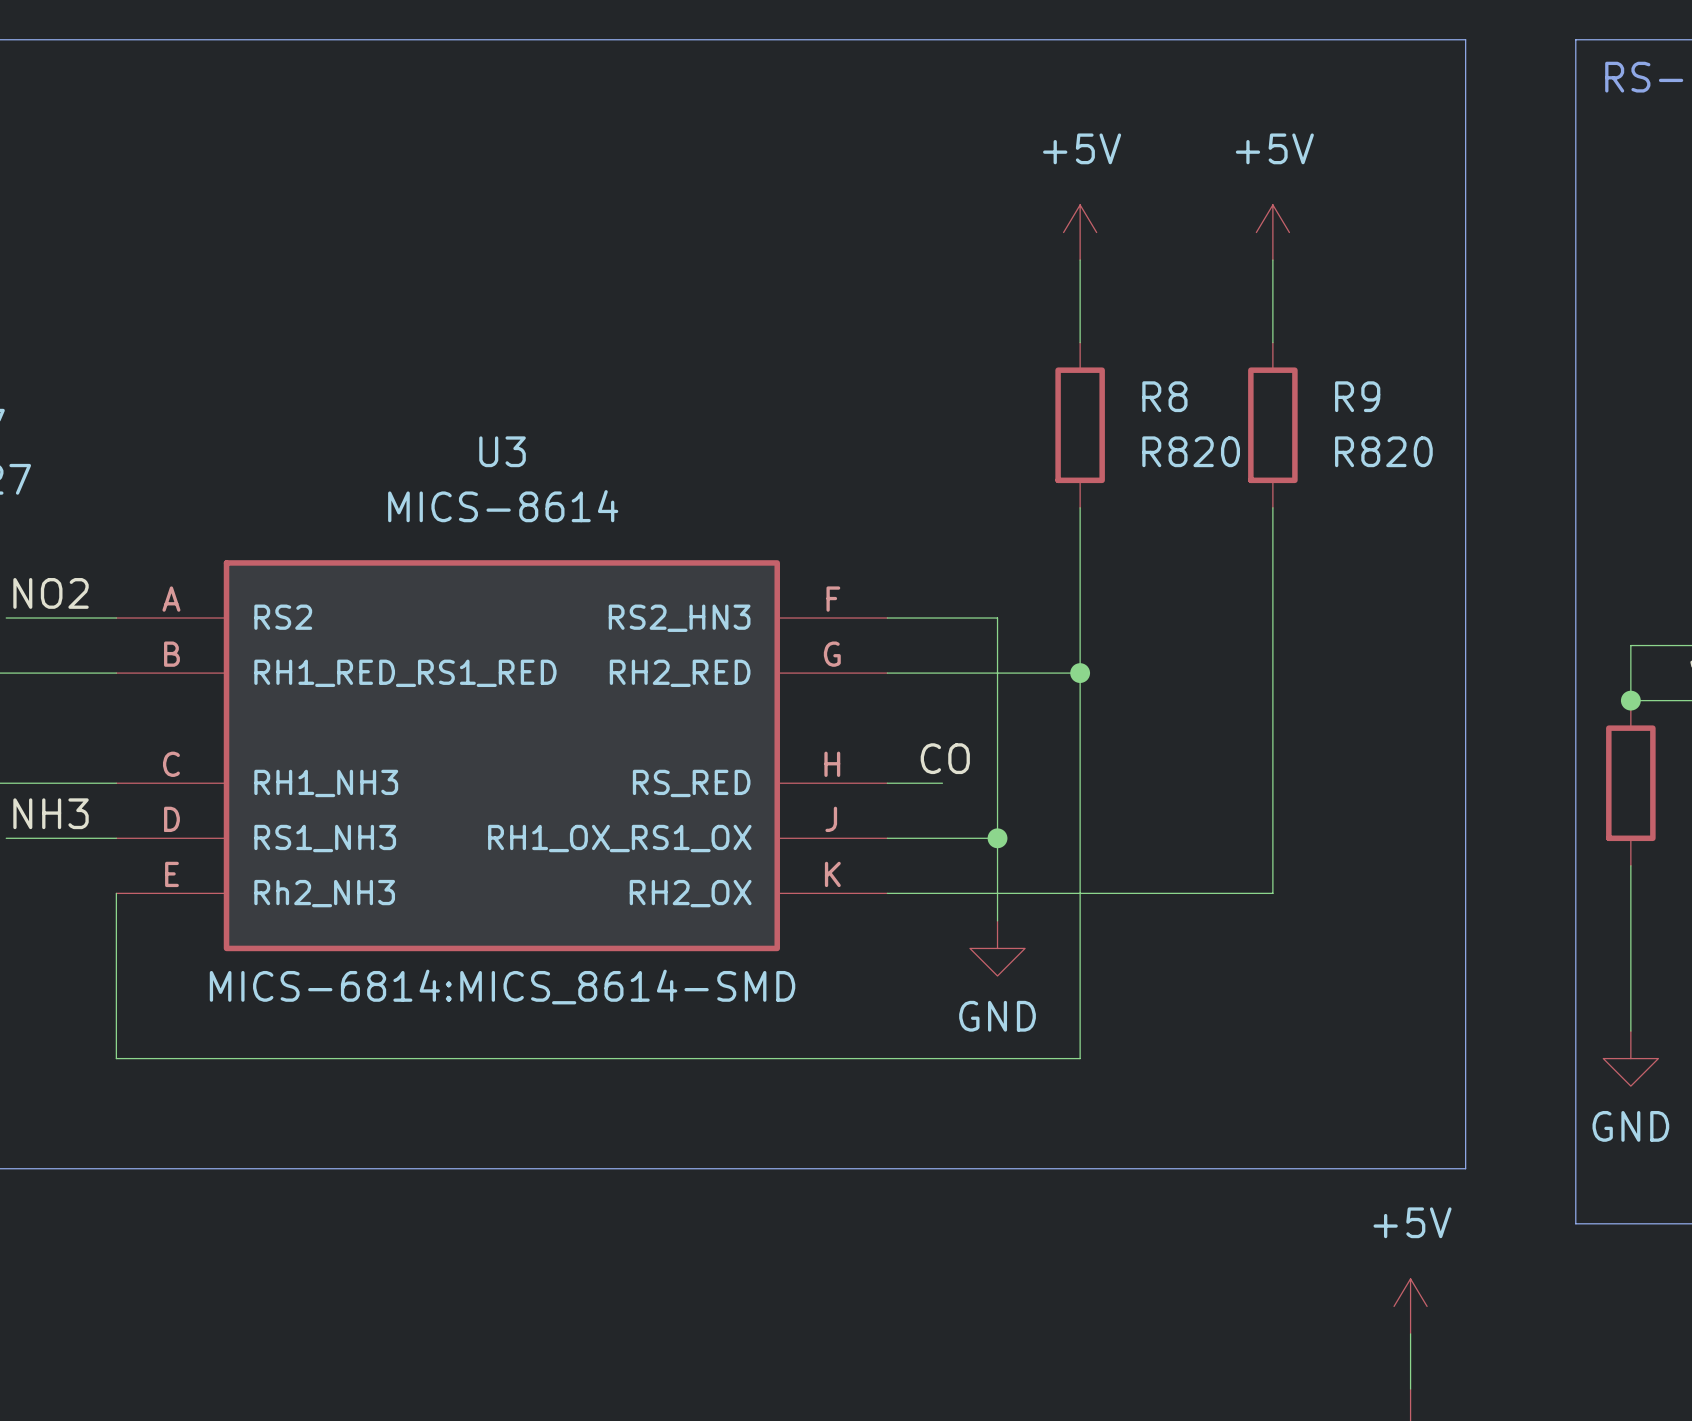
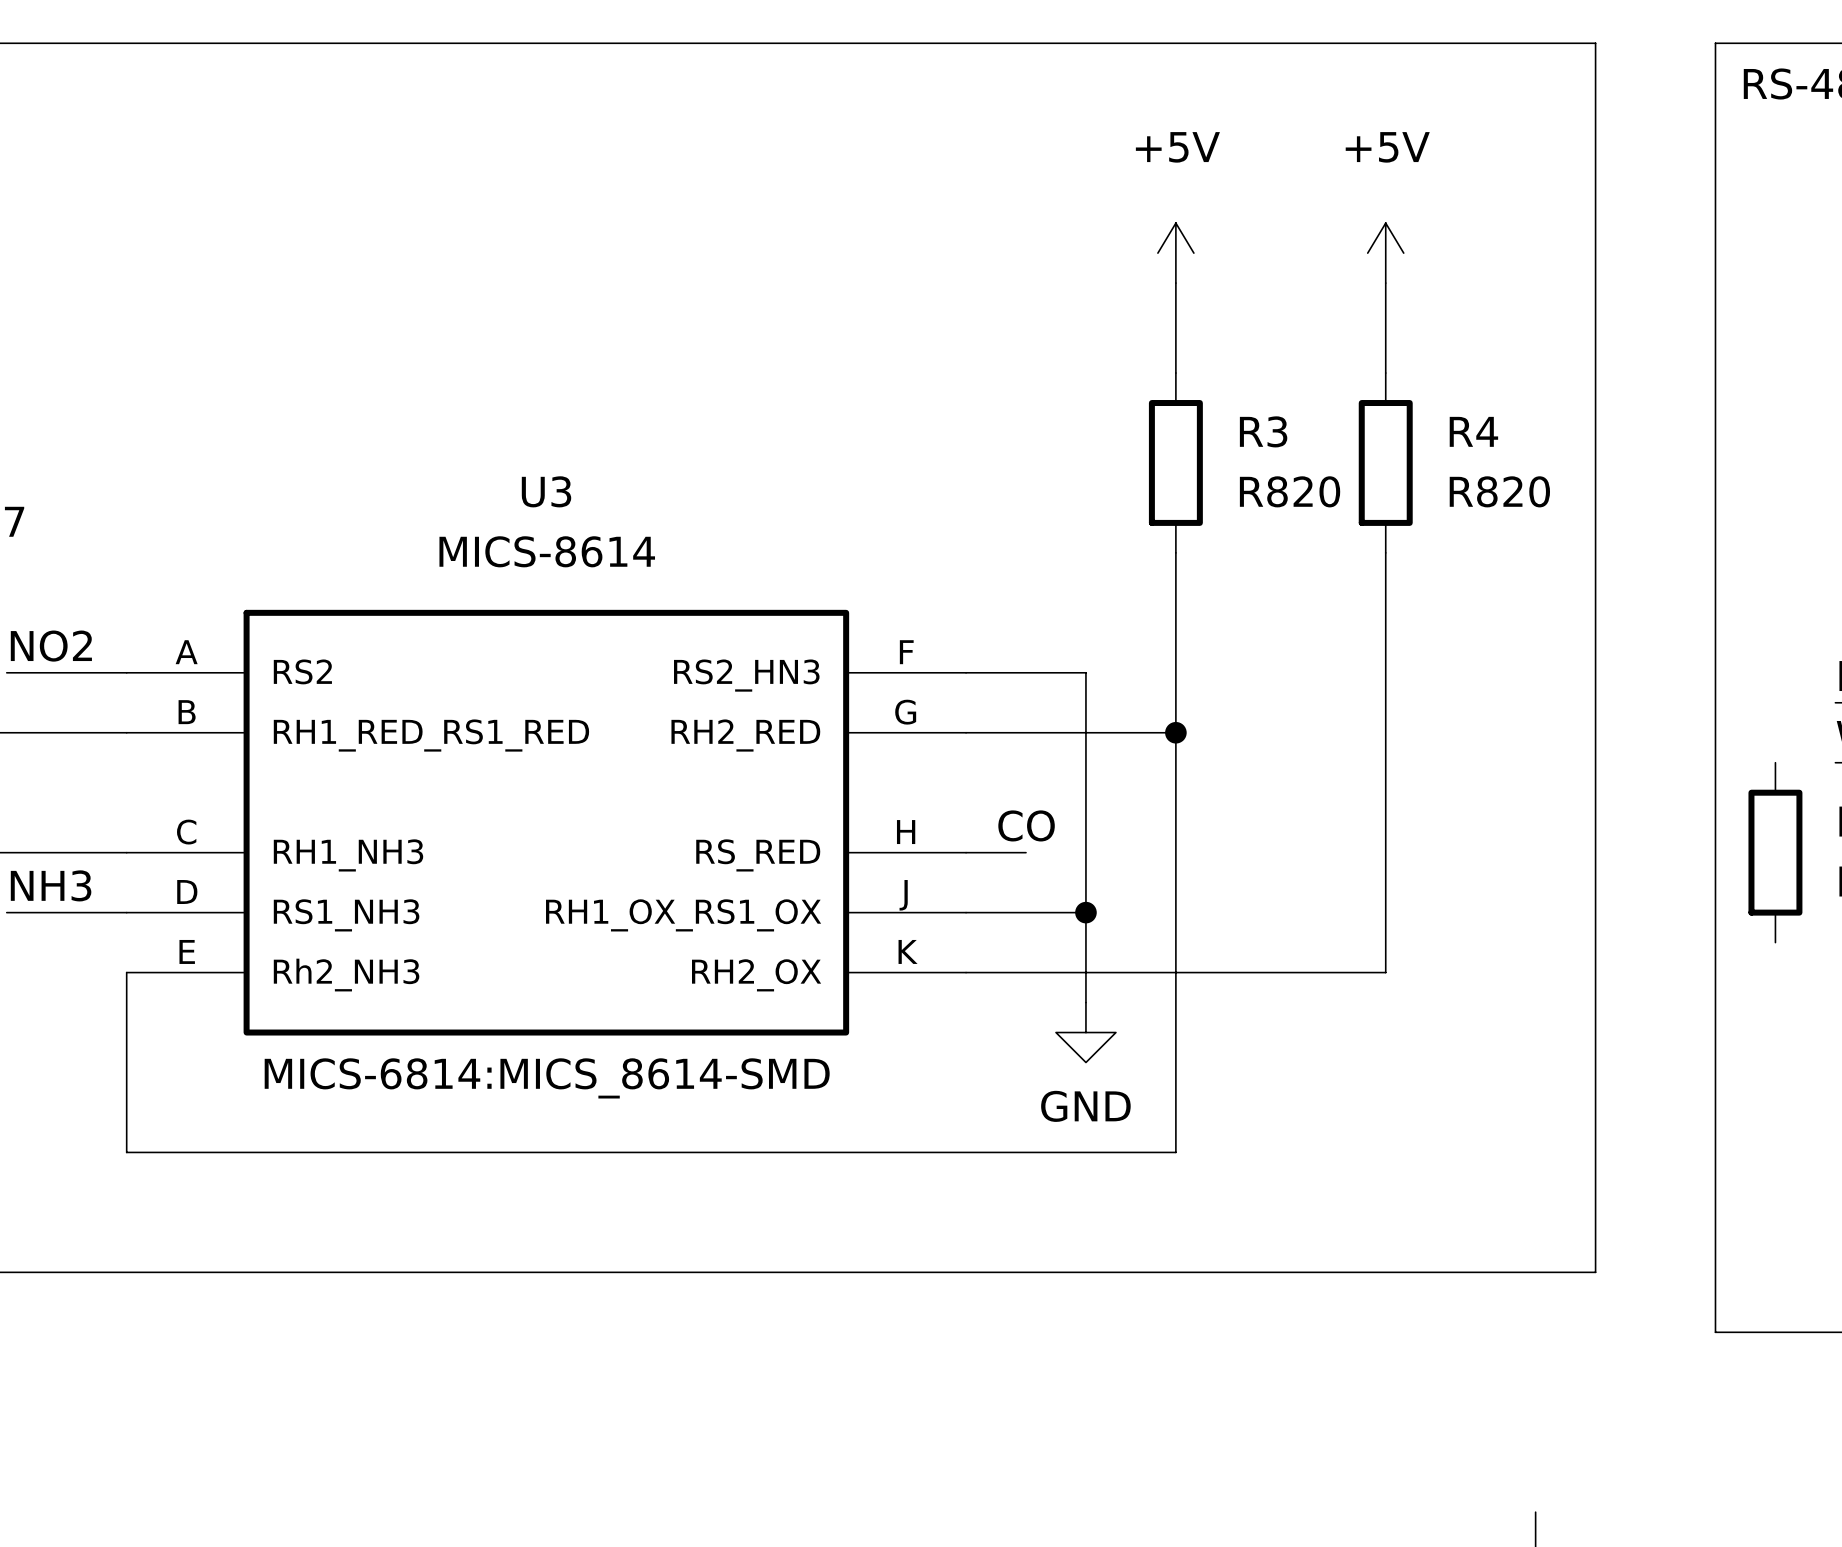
power symbol text position: +5V (1082, 148) -> +5V (1177, 147)
power symbol text position: +5V (1274, 148) -> +5V (1387, 147)
R8 name: R8 (1164, 396) -> R3 (1263, 431)
R9 name: R9 (1357, 396) -> R4 (1473, 431)
wire: (1685, 645) (1630, 645) (1630, 700) (1685, 700) -> none
junction: (1630, 700) -> none
wire: (1630, 865) (1630, 1031) -> none
power symbol: GND (1630, 1058) -> none
power symbol: +5V (1410, 1306) -> none
wire: (1410, 1333) (1410, 1389) -> none

